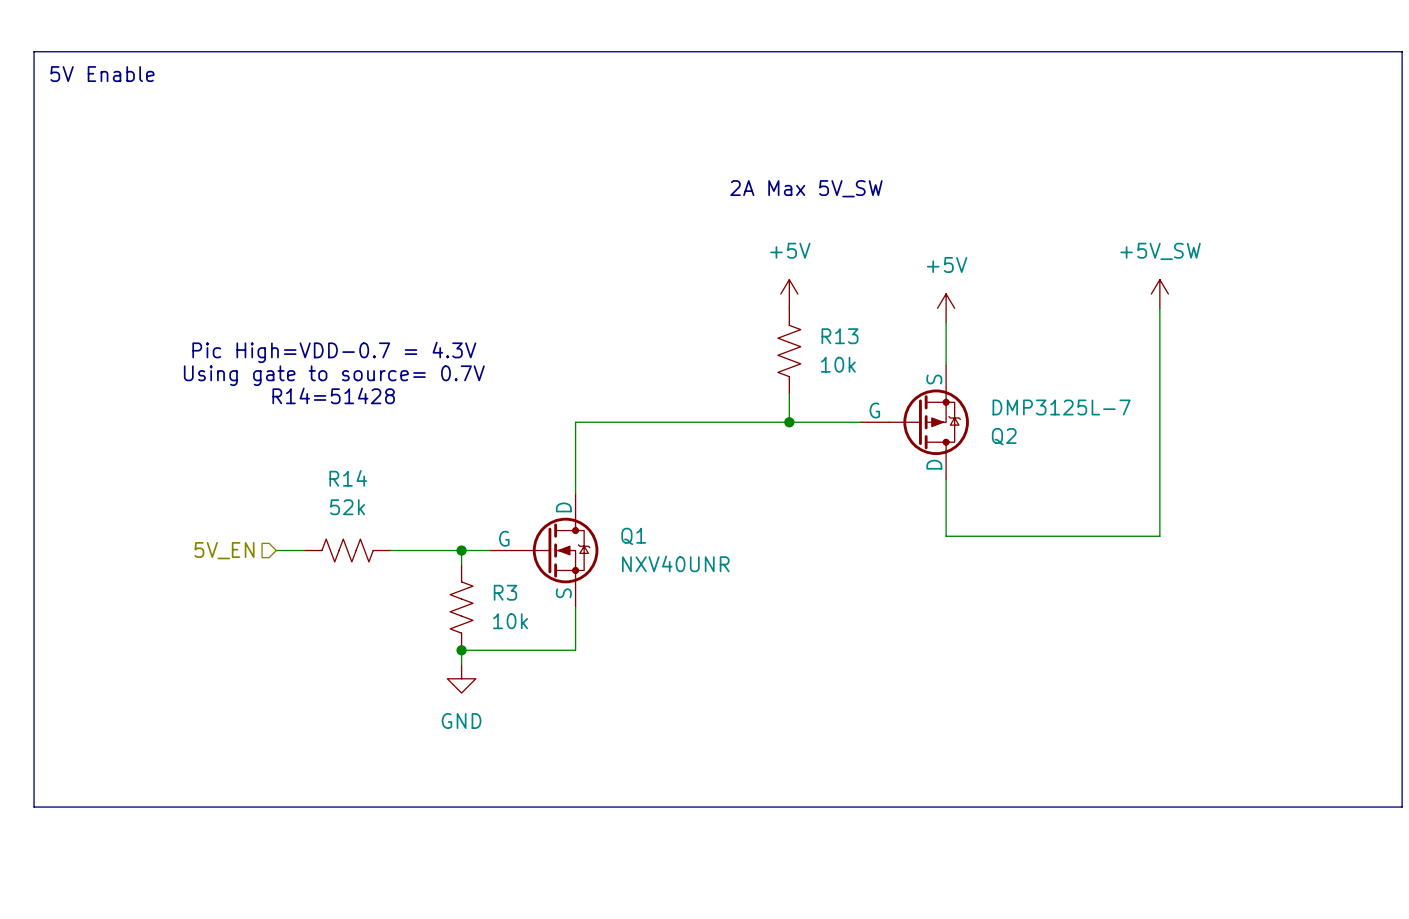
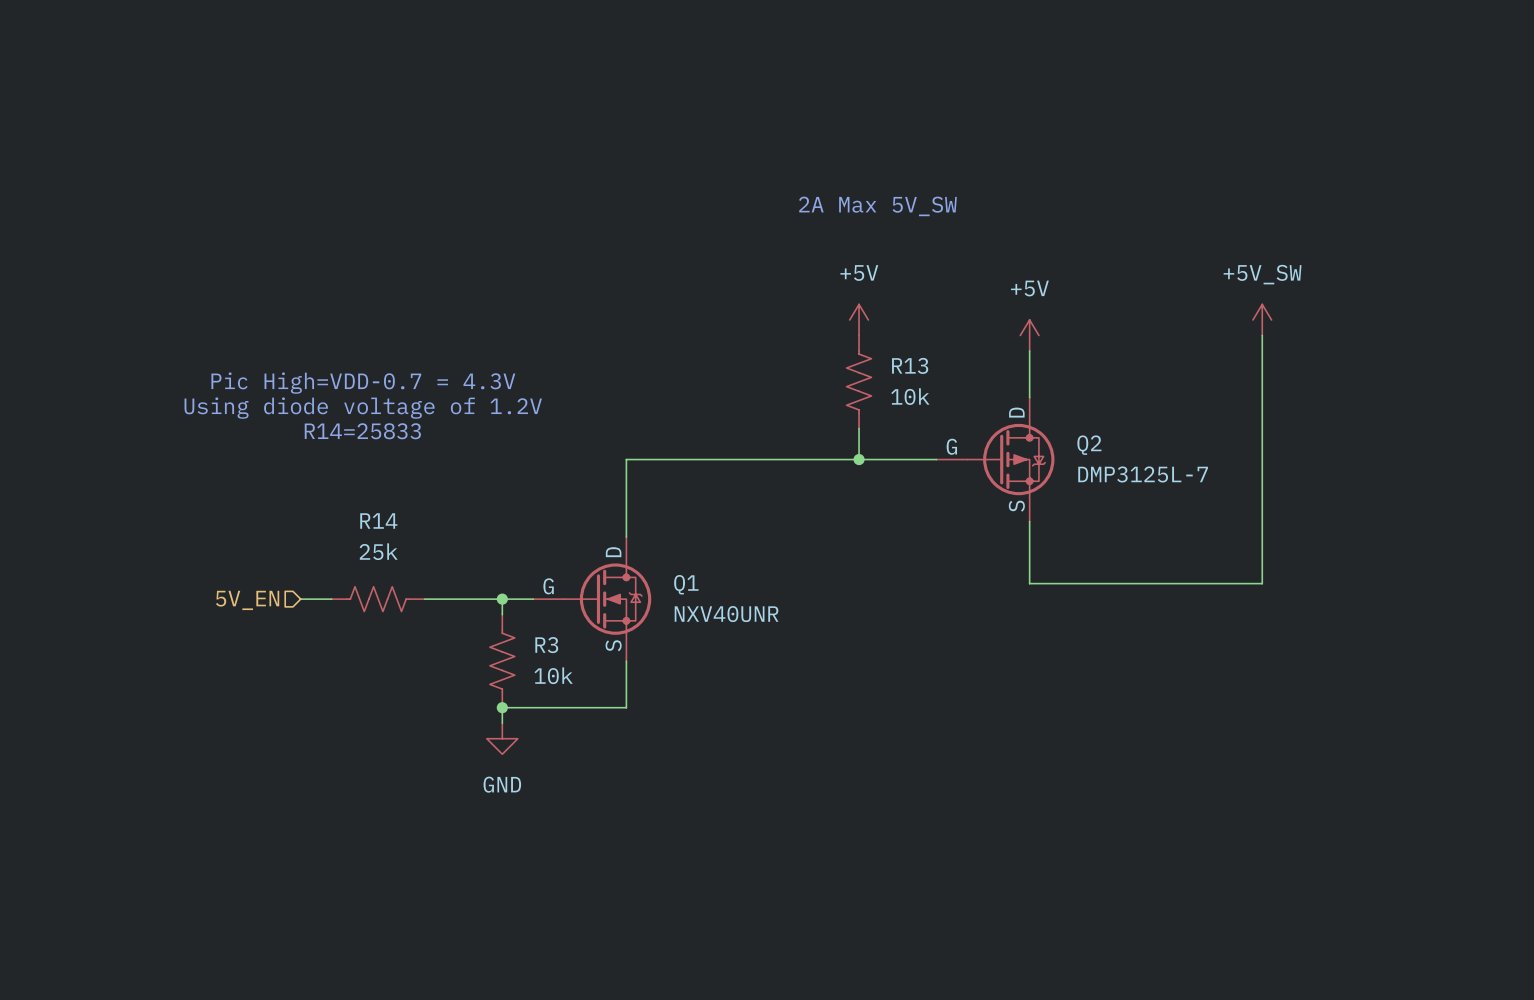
line: (34, 51) (1402, 51) (1402, 807) (34, 807) (34, 51) -> none
text: 5V Enable (102, 74) -> none
text: Using gate to source= 0.7V (334, 375) -> Using diode voltage of 1.2V (363, 408)
text: R14=51428 (333, 395) -> R14=25833 (362, 431)
Q2 flip: as is (929, 422) -> up-down (1011, 459)
R14 value: 52k (347, 507) -> 25k (378, 551)

